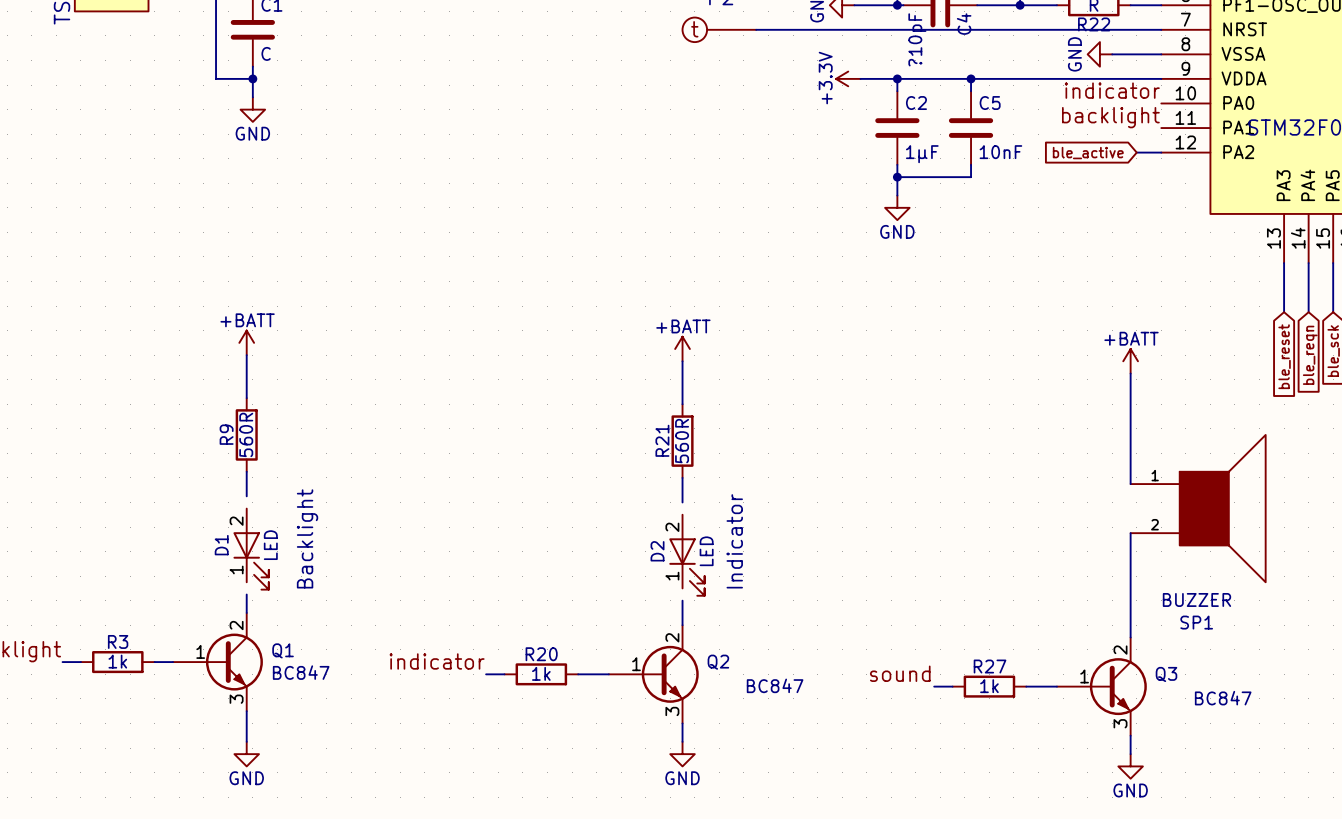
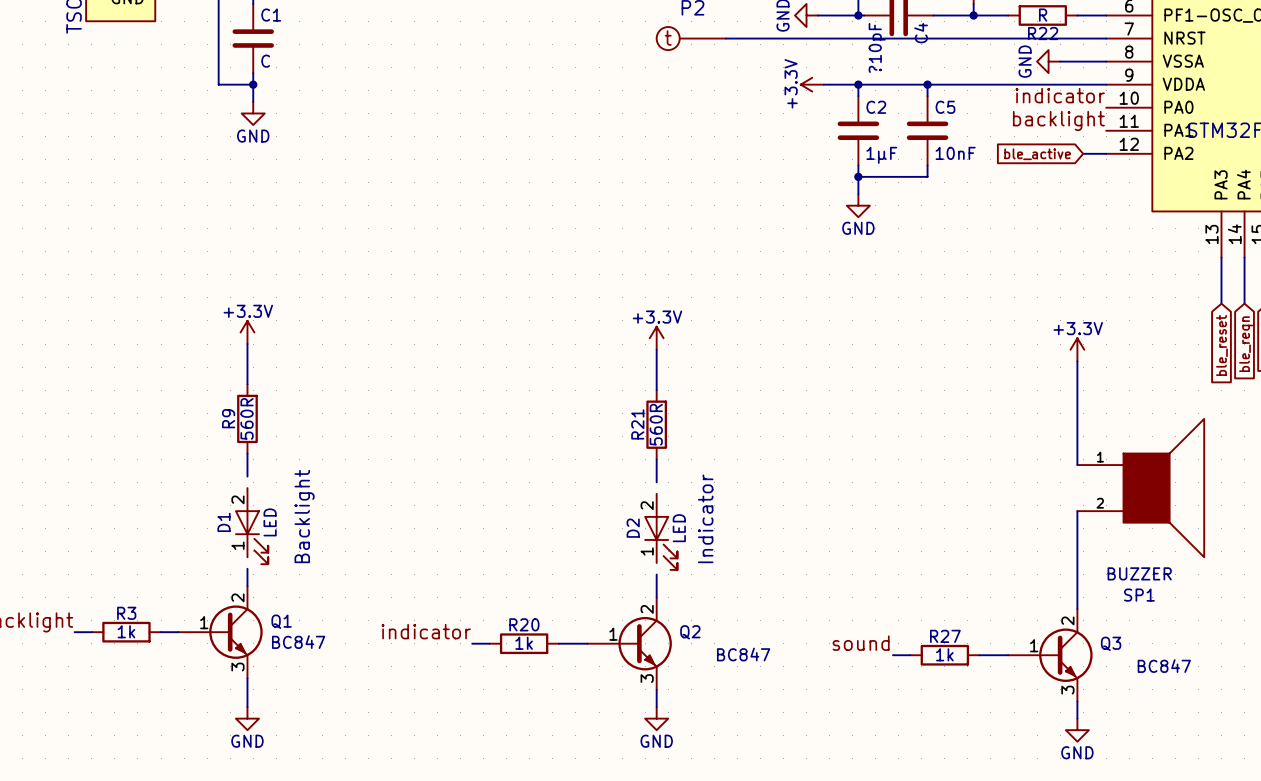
power symbol: +BATT (246, 342) -> +3.3V (247, 332)
power symbol: +BATT (682, 349) -> +3.3V (656, 338)
power symbol: +BATT (1130, 361) -> +3.3V (1077, 349)

